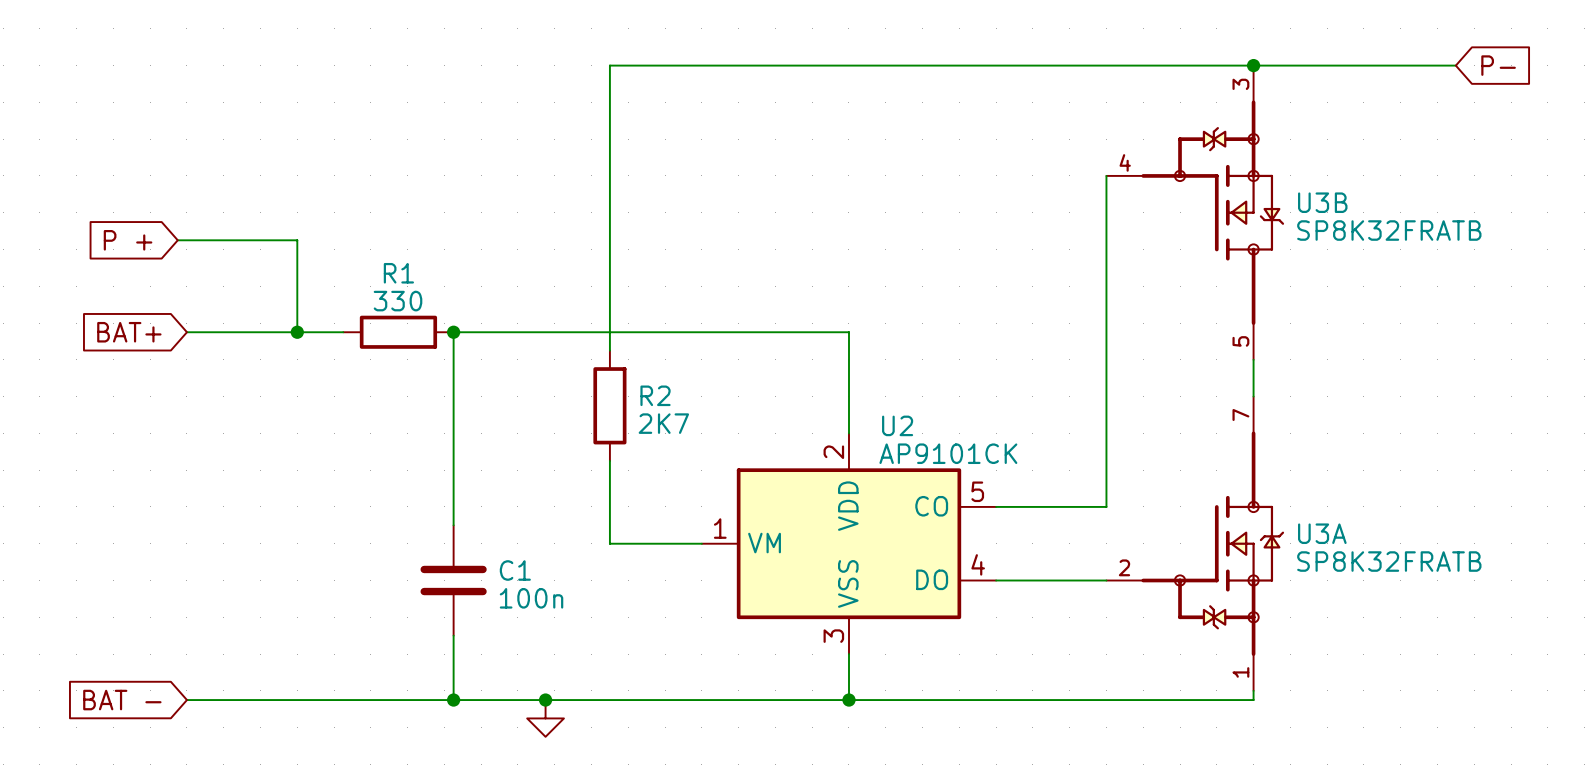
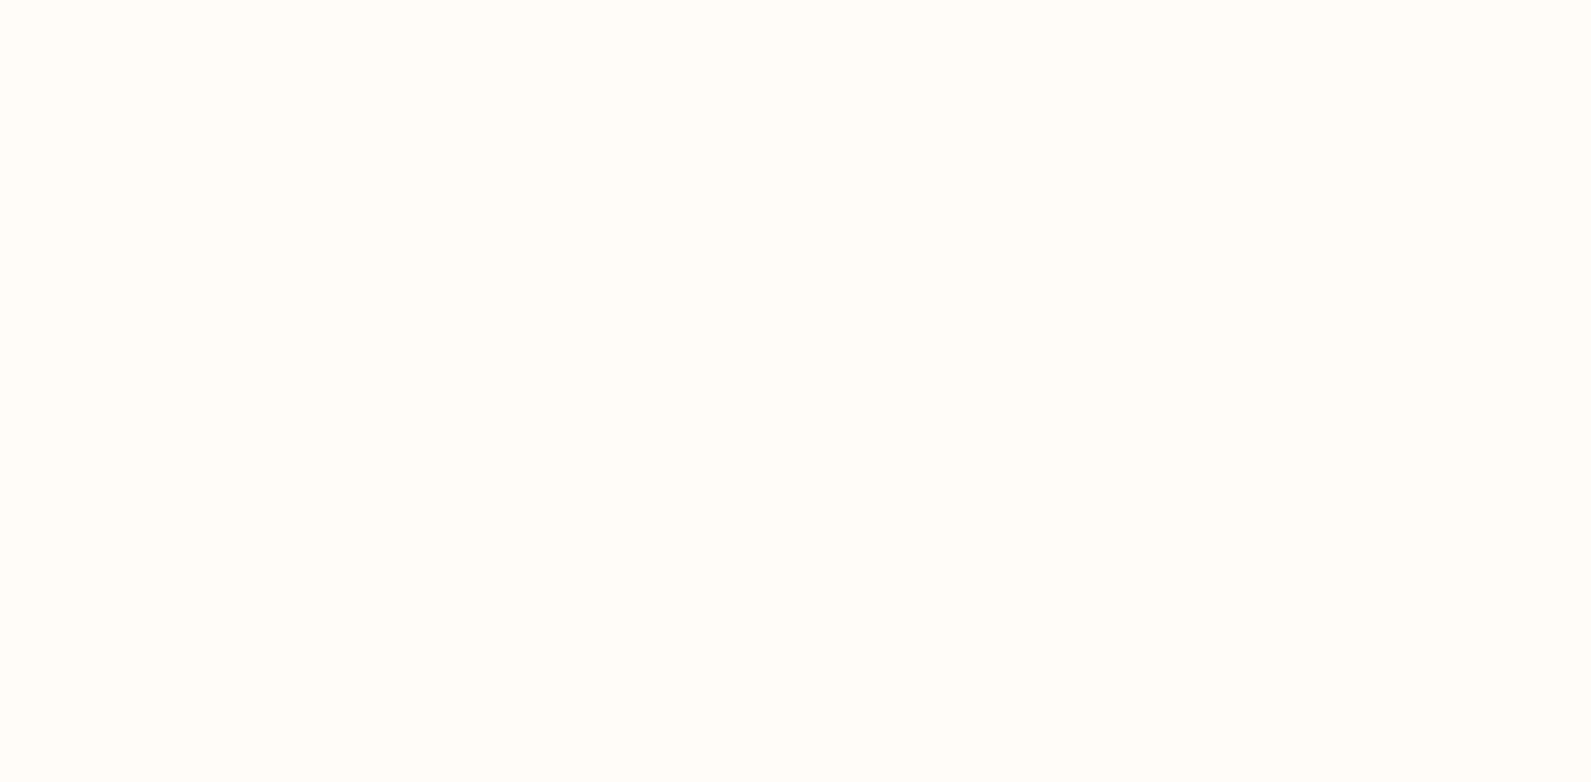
junction: (1253, 65) -> none
wire: (1455, 65) (609, 65) (609, 350) -> none
global label: P- (1498, 65) -> none
wire: (1106, 175) (1106, 506) (996, 506) -> none
U3B: SP8K32FRATB (1195, 212) -> none
global label: P + (128, 240) -> none
wire: (177, 240) (297, 240) (297, 332) -> none
global label: BAT+ (129, 332) -> none
wire: (186, 332) (343, 332) -> none
junction: (297, 332) -> none
R1: 330 (398, 332) -> none
junction: (453, 332) -> none
wire: (1253, 359) (1253, 396) -> none
R2: 2K7 (609, 405) -> none
wire: (848, 433) (848, 332) (453, 332) (453, 525) -> none
wire: (609, 460) (609, 543) (701, 543) -> none
U2: AP9101CK (848, 543) -> none
U3A: SP8K32FRATB (1195, 543) -> none
C1: 100n (453, 580) -> none
wire: (996, 580) (1106, 580) -> none
wire: (453, 635) (453, 700) -> none
wire: (848, 654) (848, 700) -> none
wire: (1253, 690) (1253, 700) (186, 700) -> none
global label: BAT - (122, 700) -> none
junction: (453, 700) -> none
junction: (545, 700) -> none
junction: (848, 700) -> none
power symbol: (545, 718) -> none

